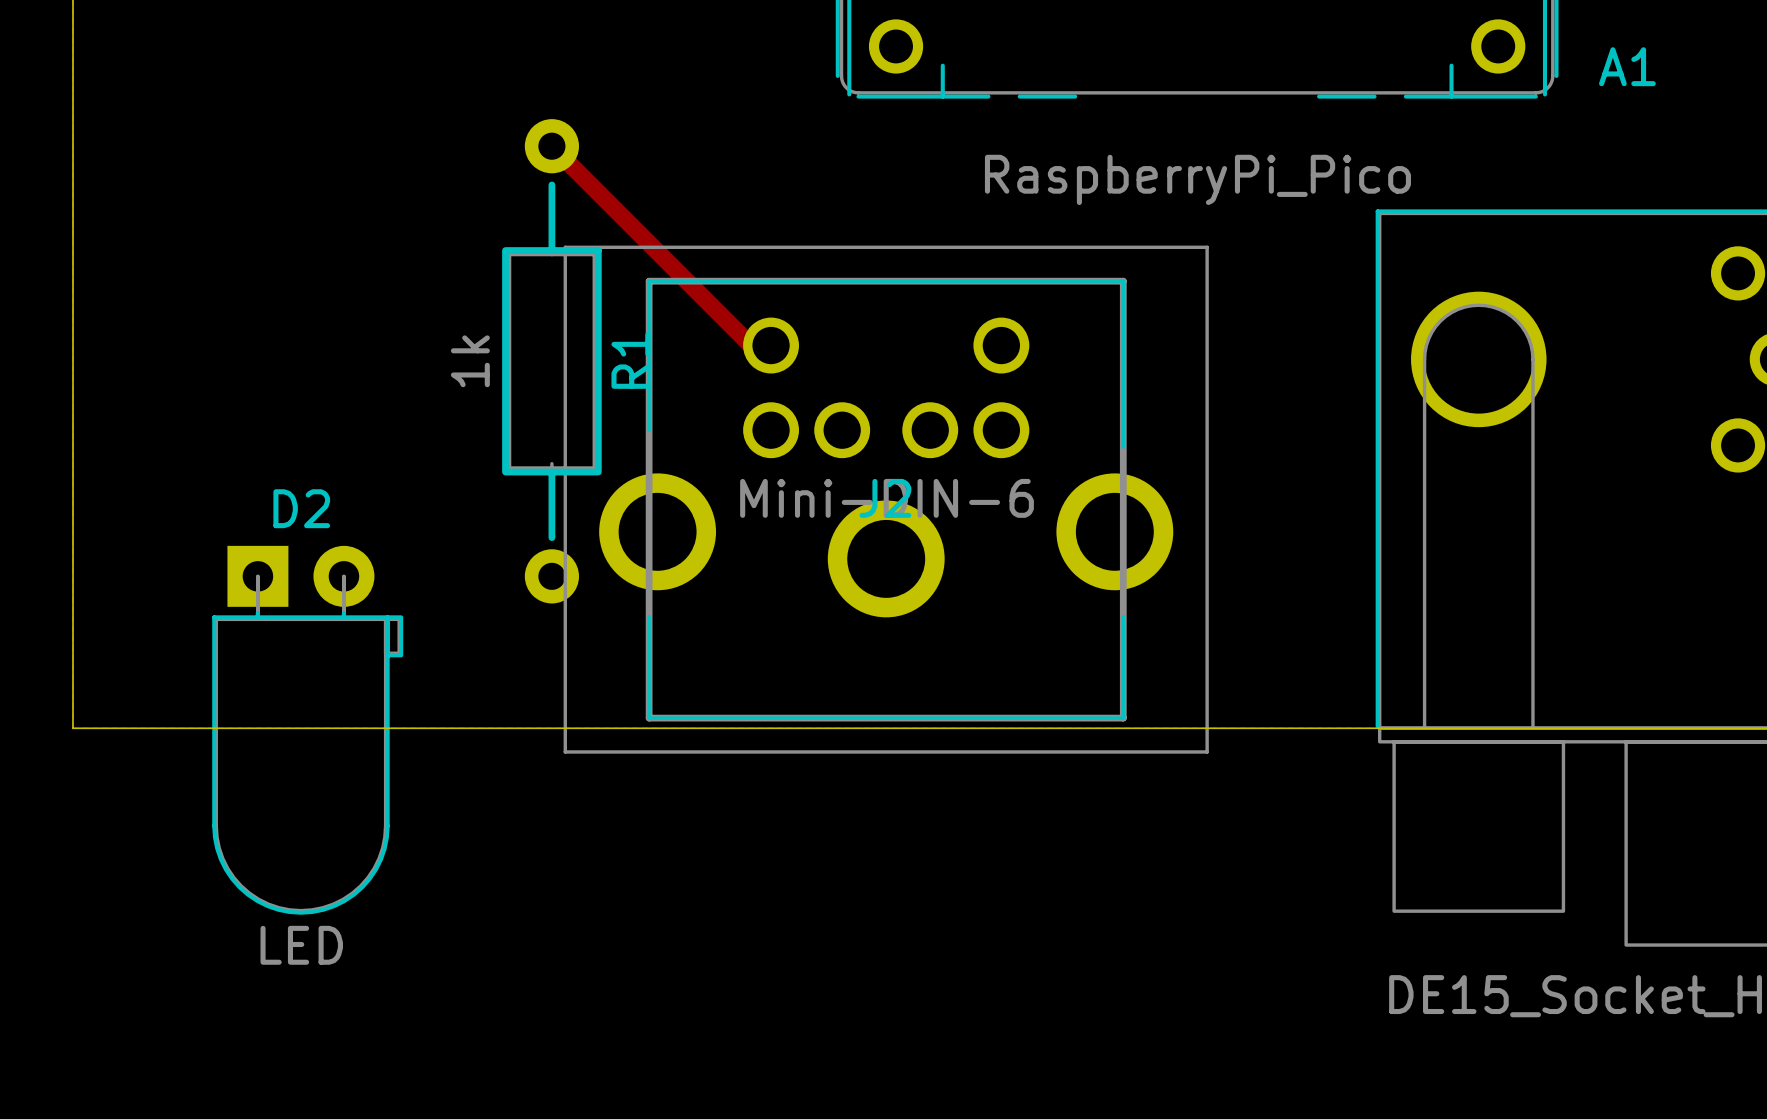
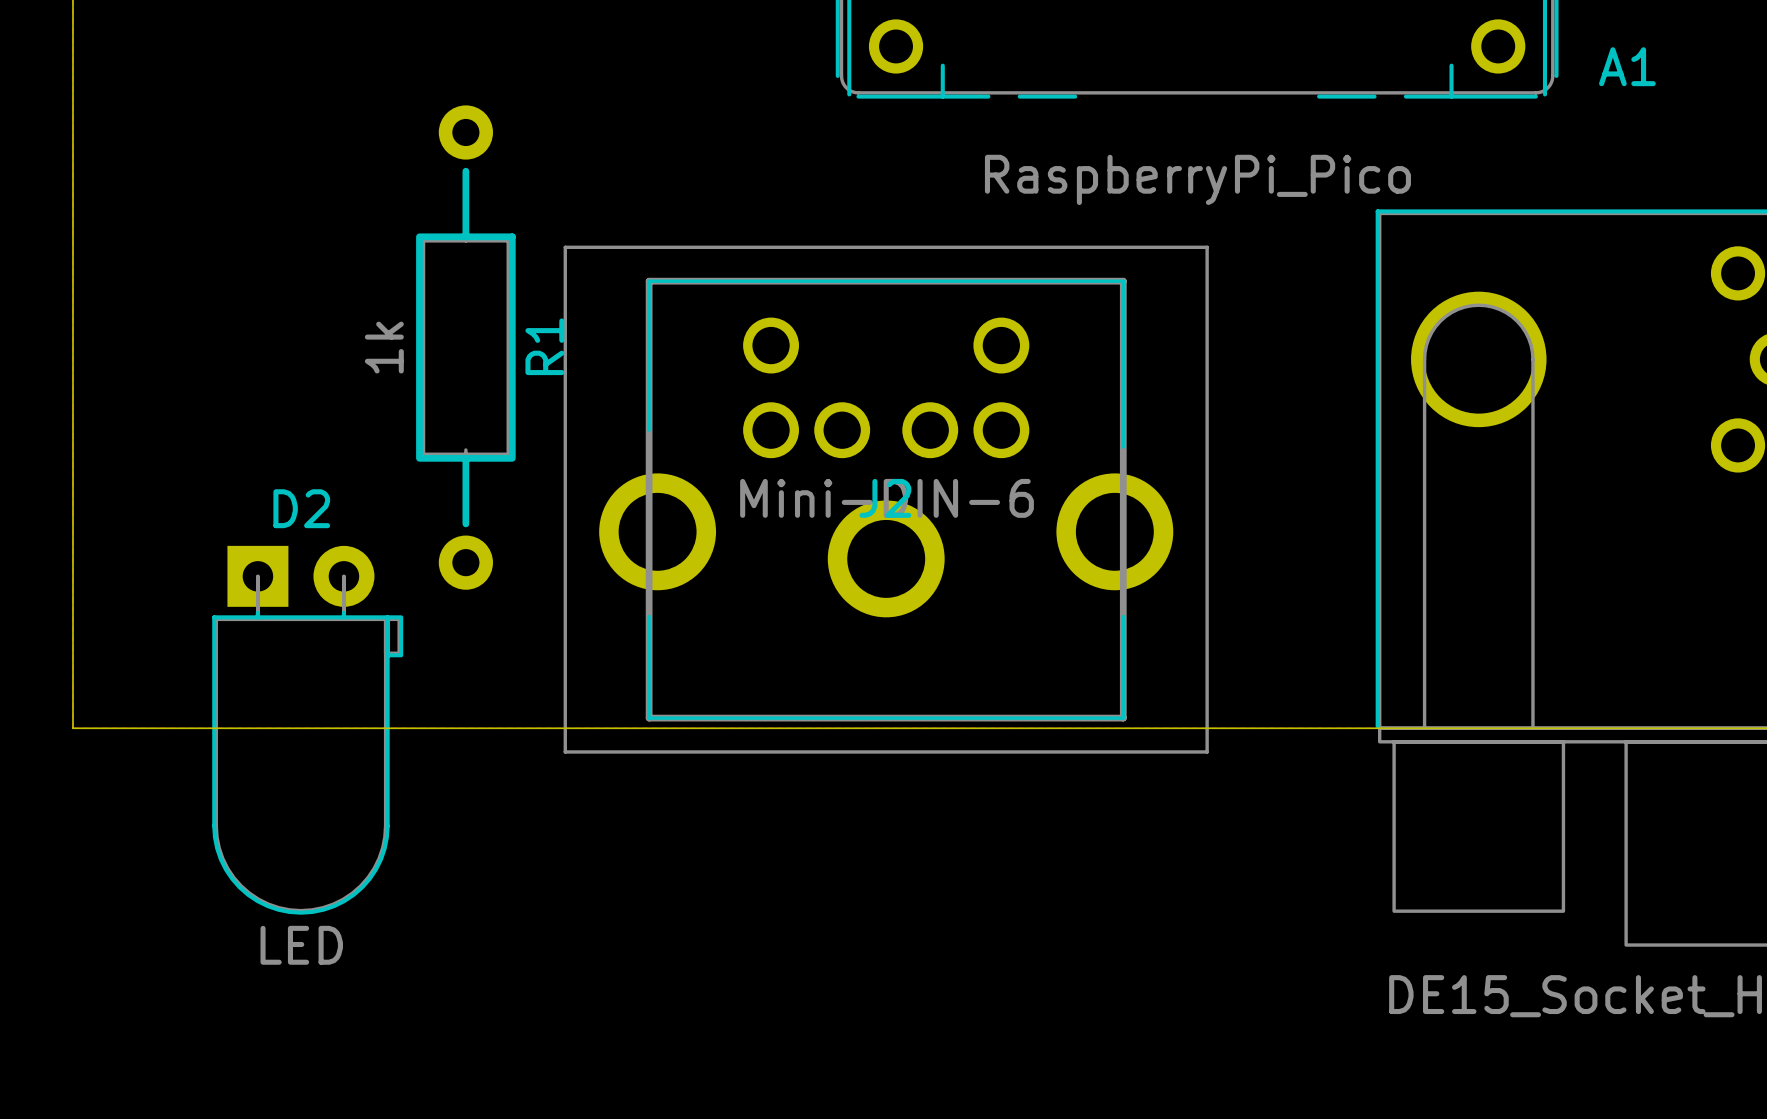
track: (551, 146) (751, 345) (771, 345) -> none
R1 position: (551, 361) -> (465, 347)

